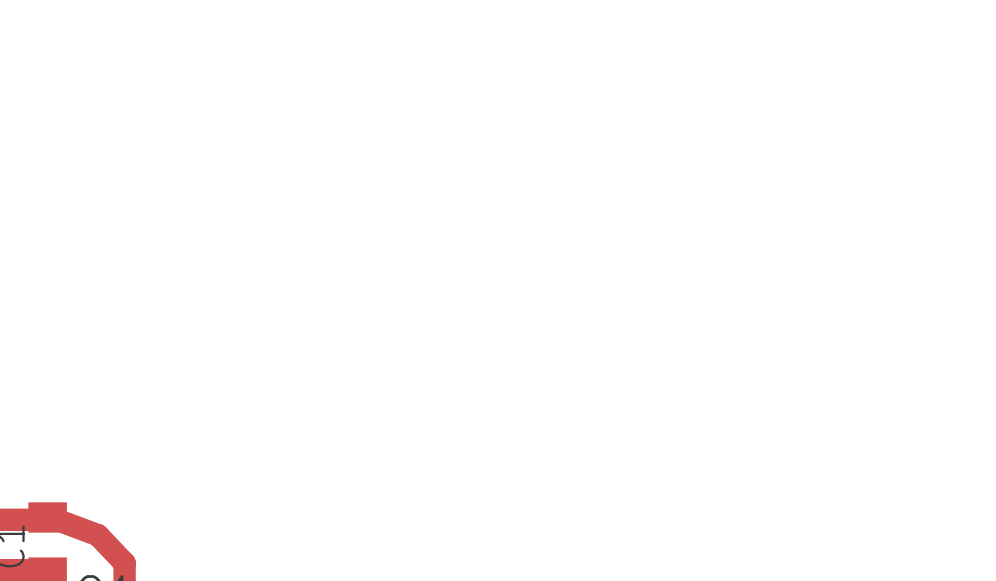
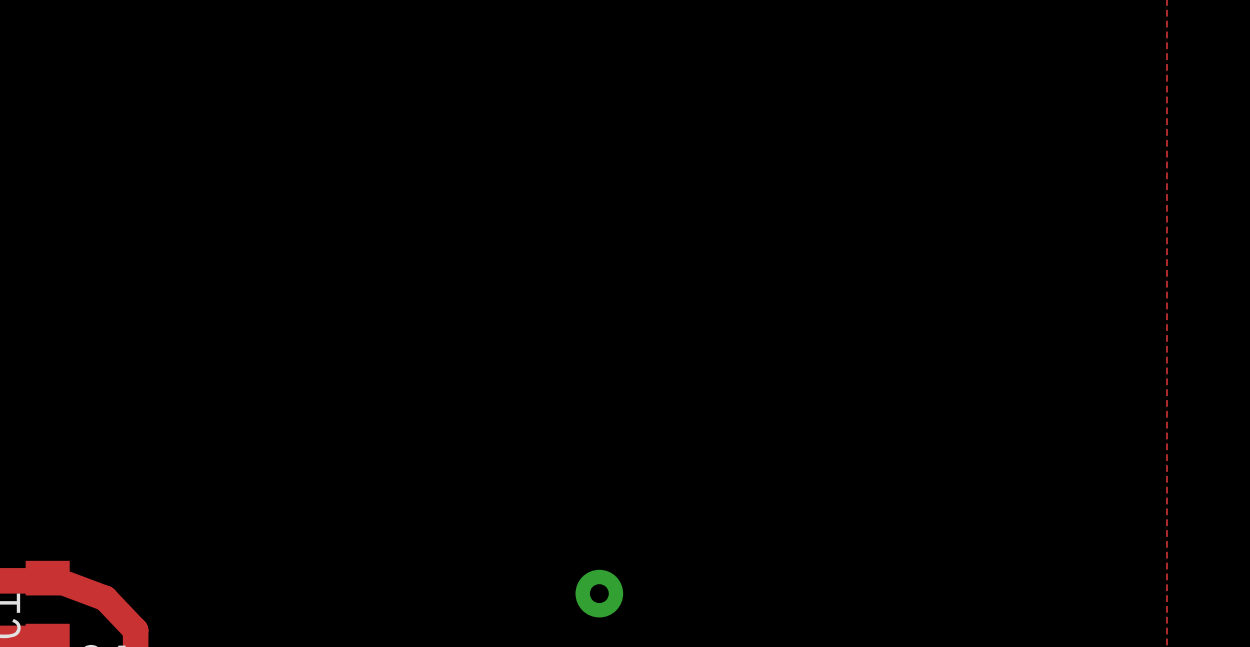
via: none -> (599, 593)

